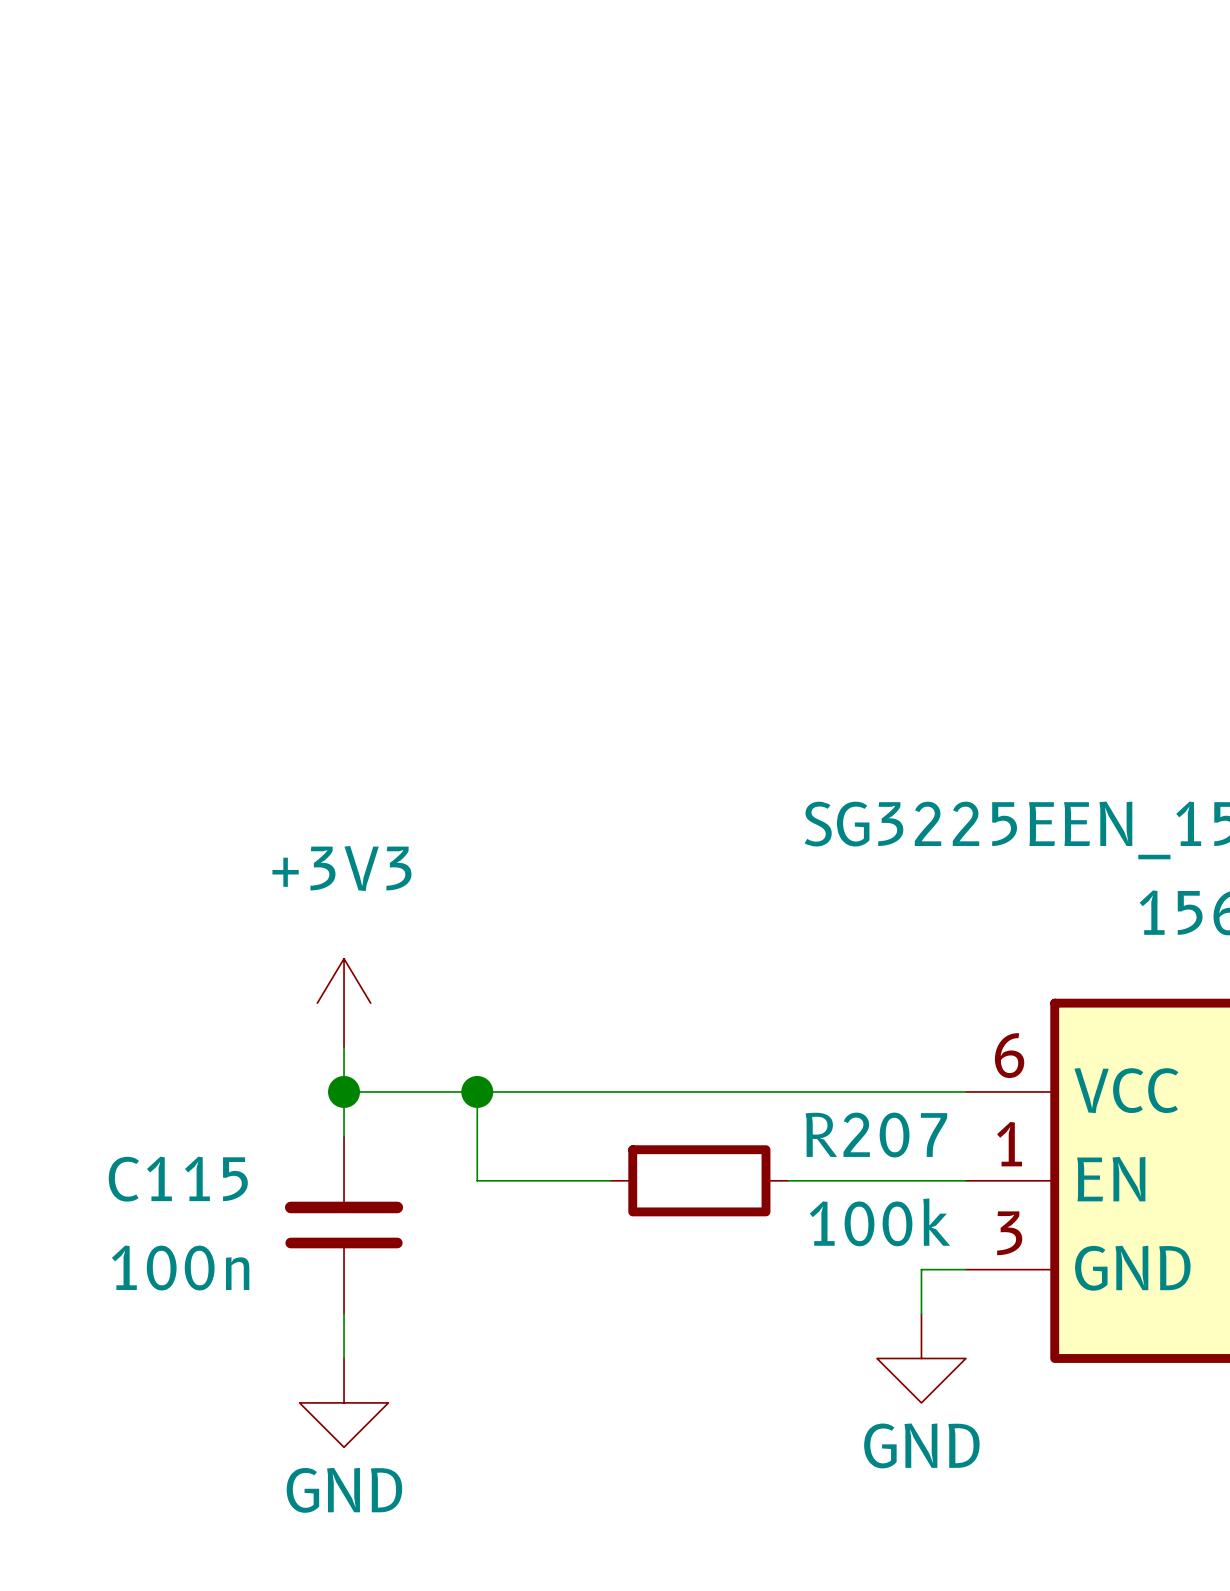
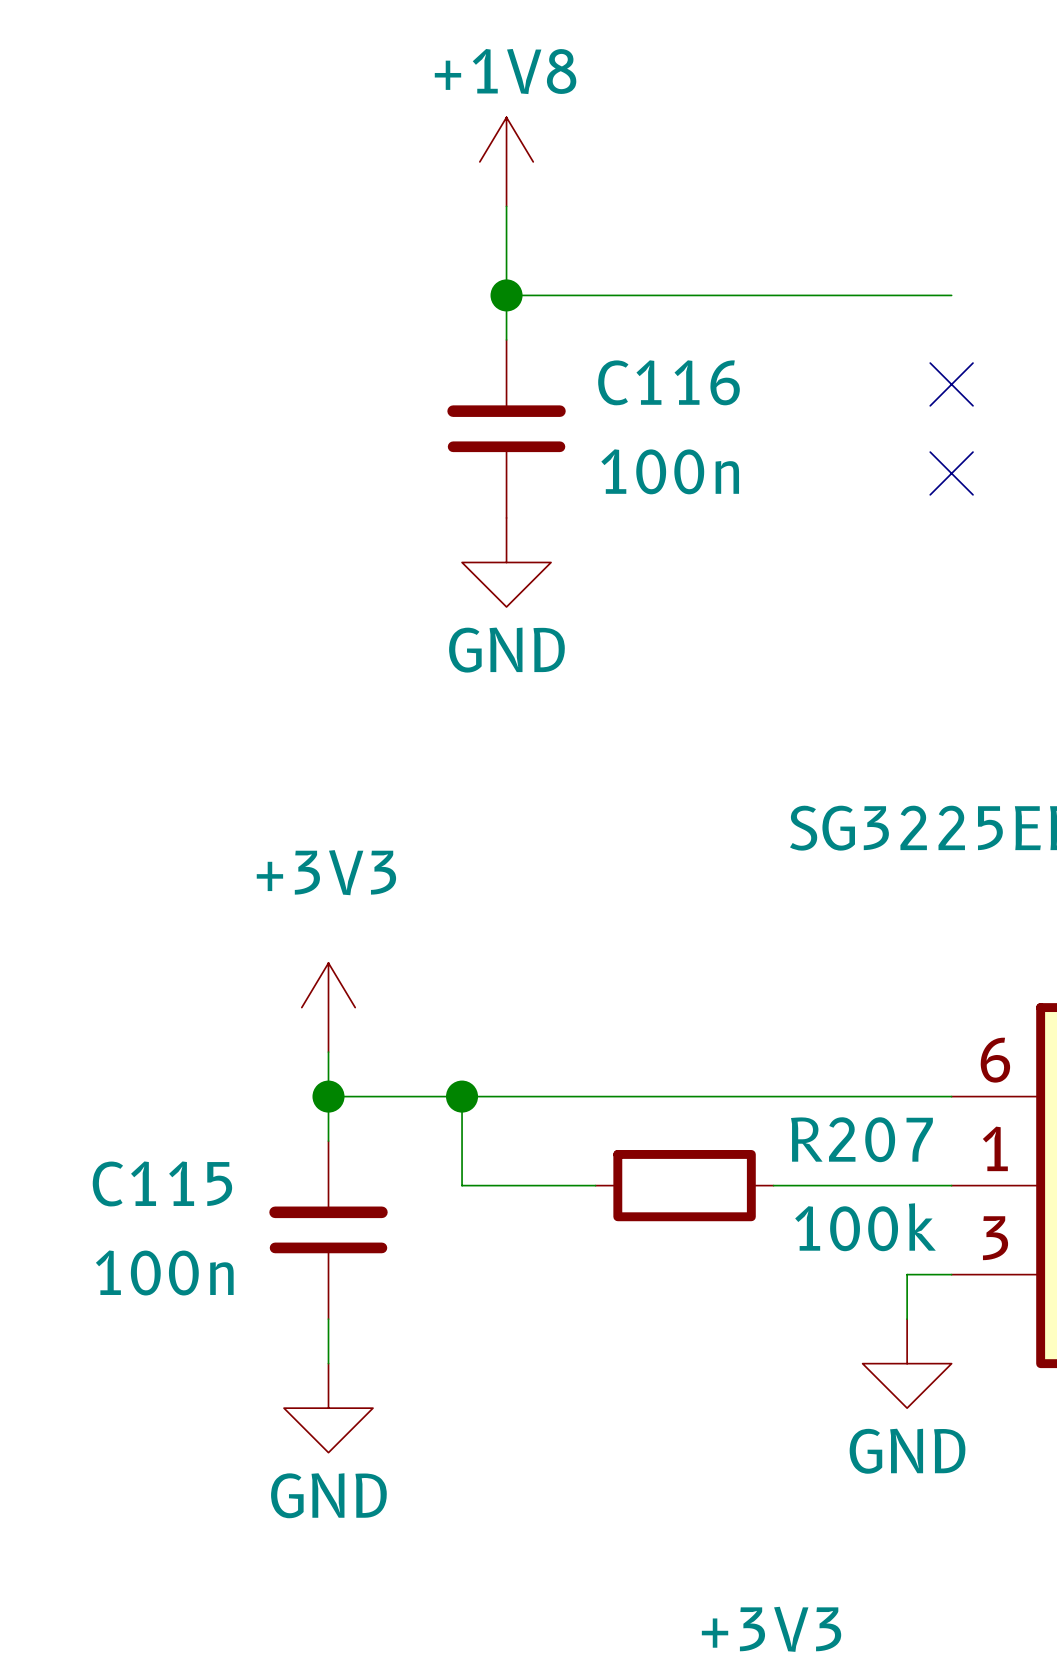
power symbol: none -> +1V8 (506, 161)
wire: none -> (506, 206) (506, 339)
wire: none -> (506, 295) (951, 295)
junction: none -> (506, 295)
no-connect mark: none -> (951, 384)
C116: none -> (506, 428)
no-connect mark: none -> (951, 473)
power symbol: none -> GND (506, 562)

